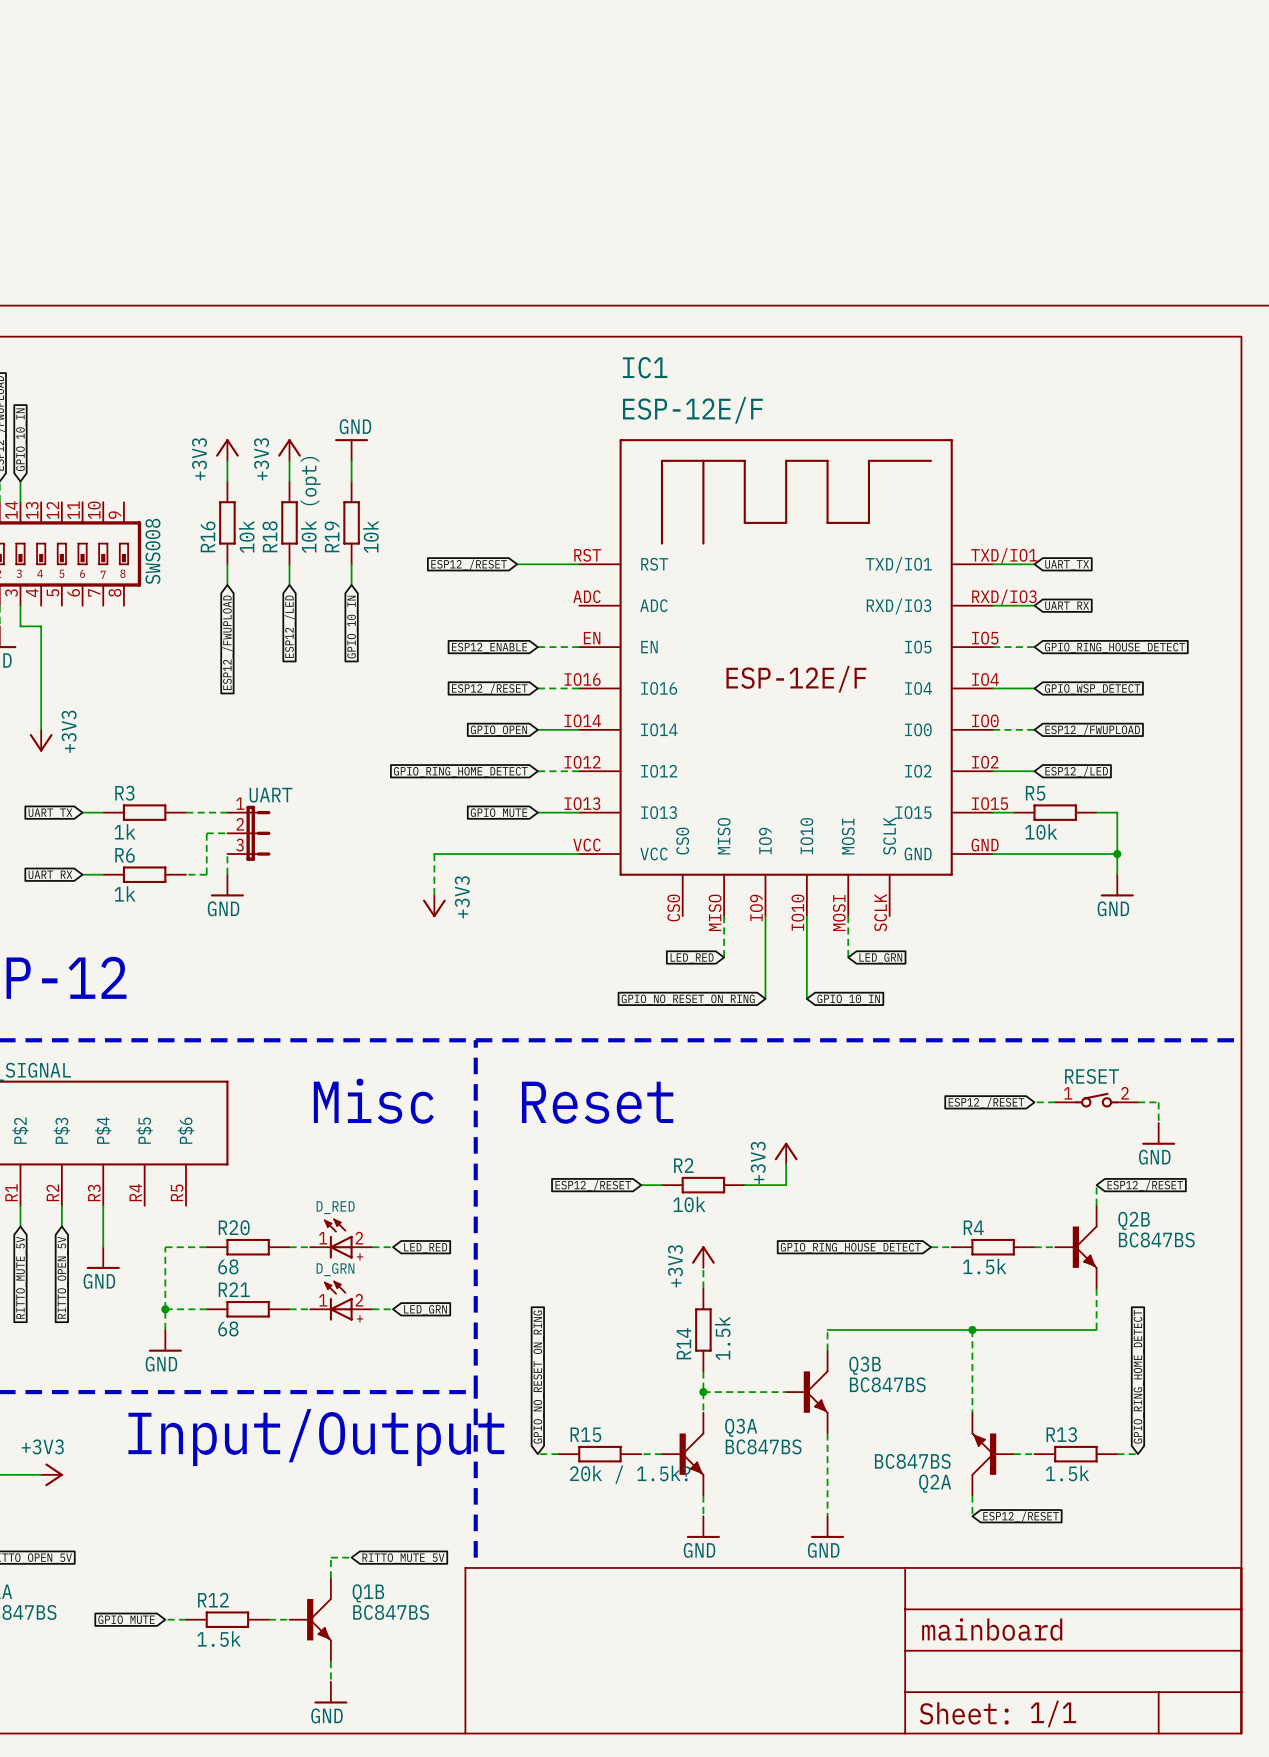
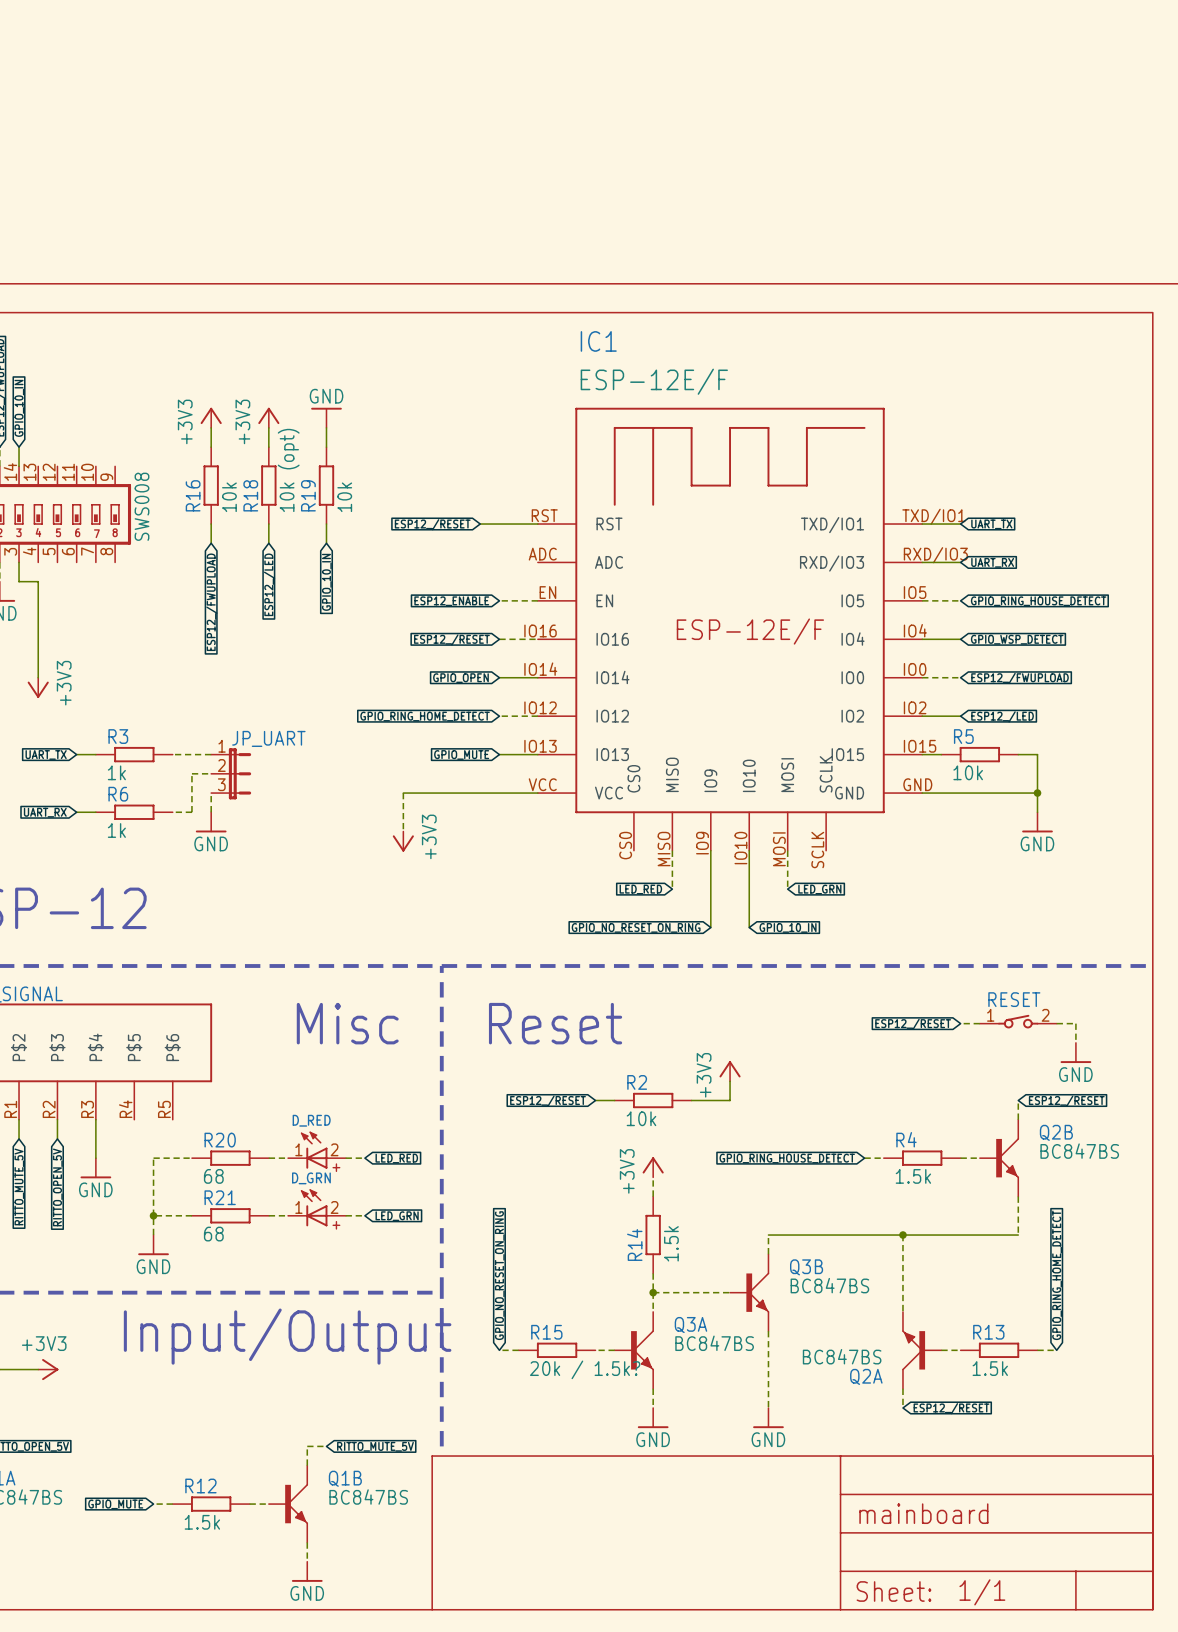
UART name: UART (271, 795) -> JP_UART (268, 738)

